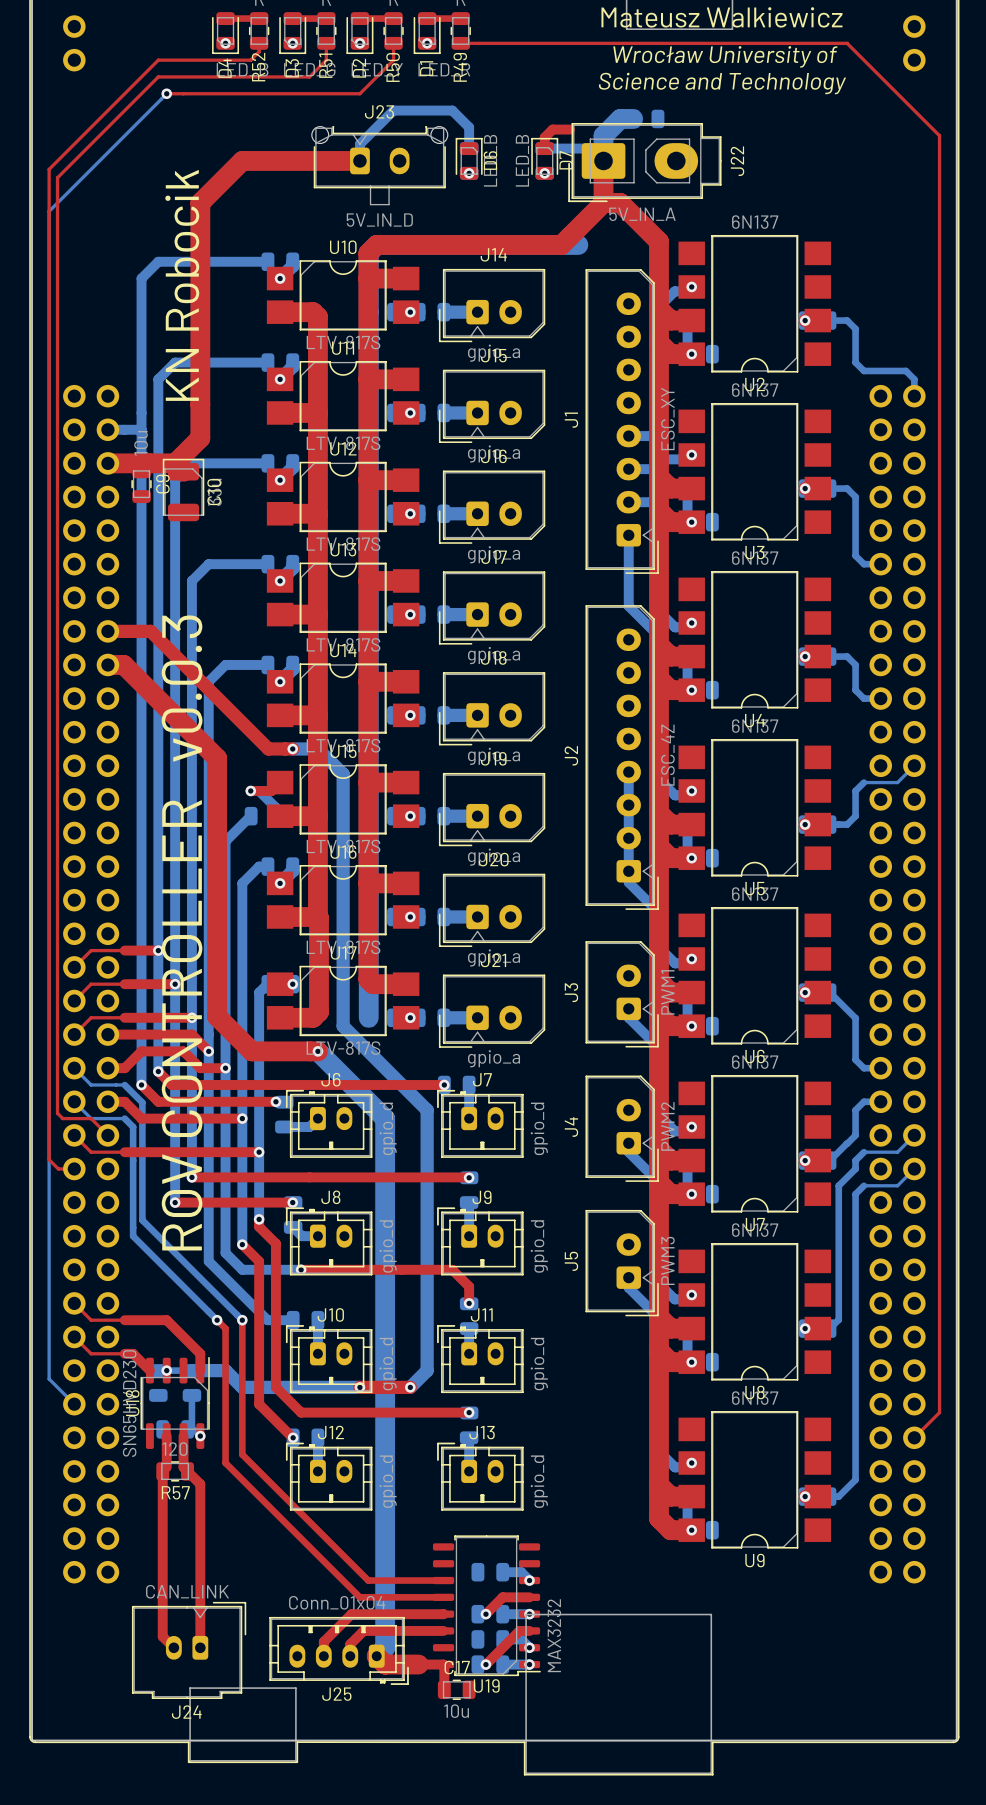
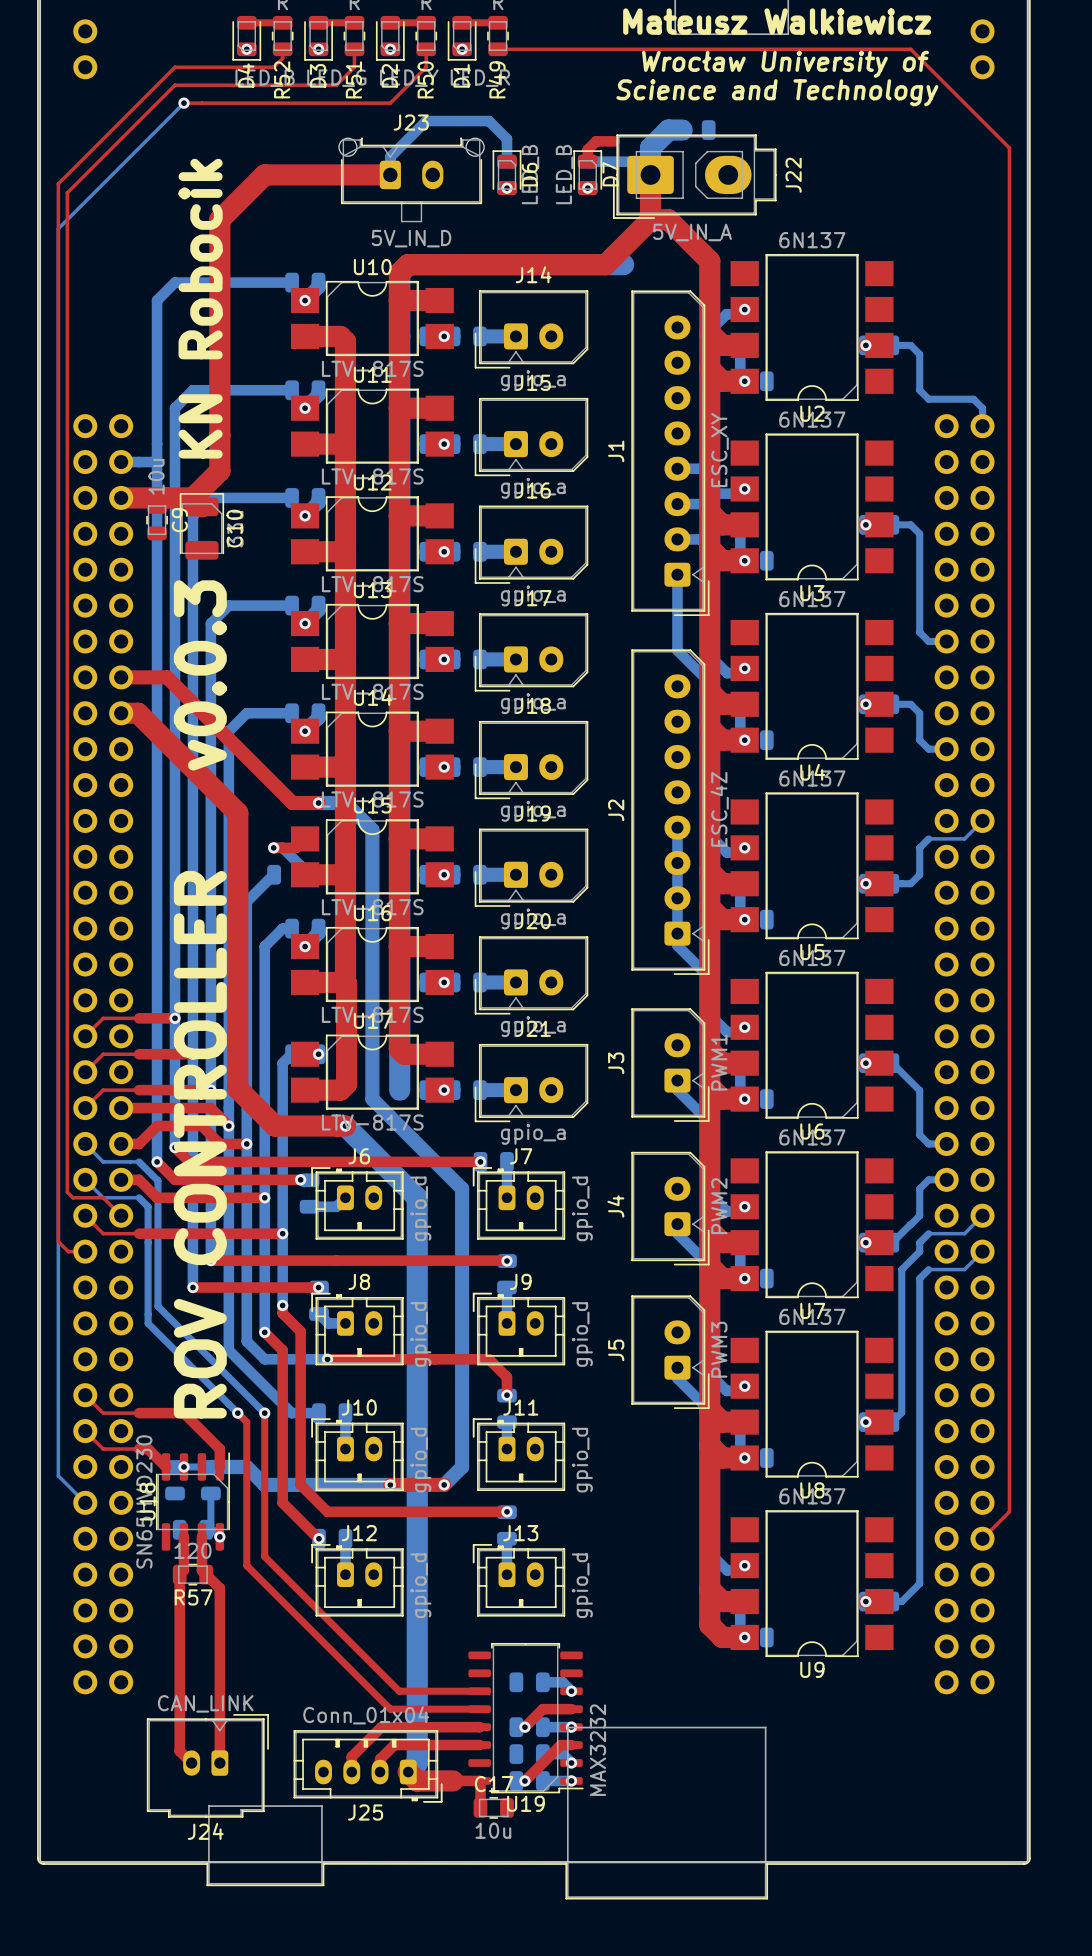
bottom track: (855, 555) (863, 564) (880, 564) -> (919, 596) (919, 632) (928, 641) (946, 641)

